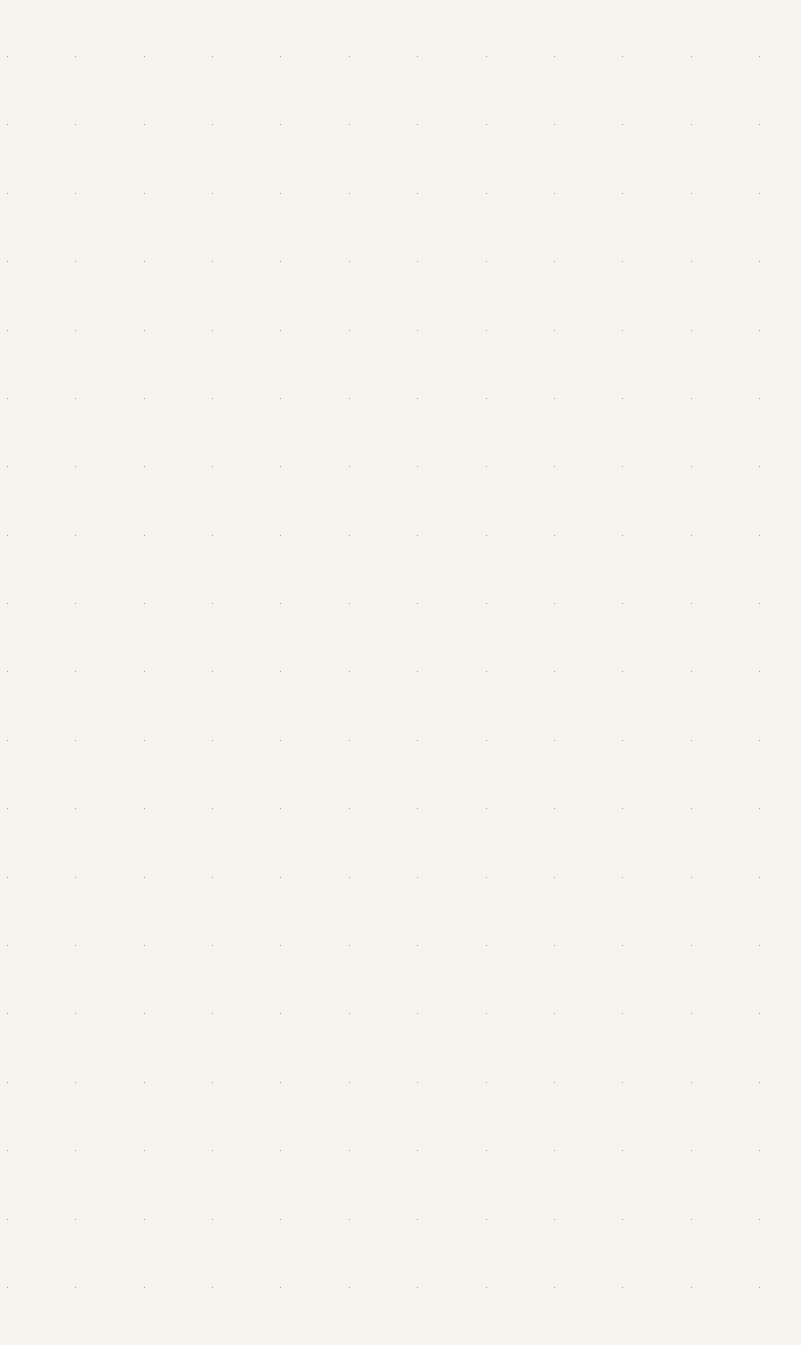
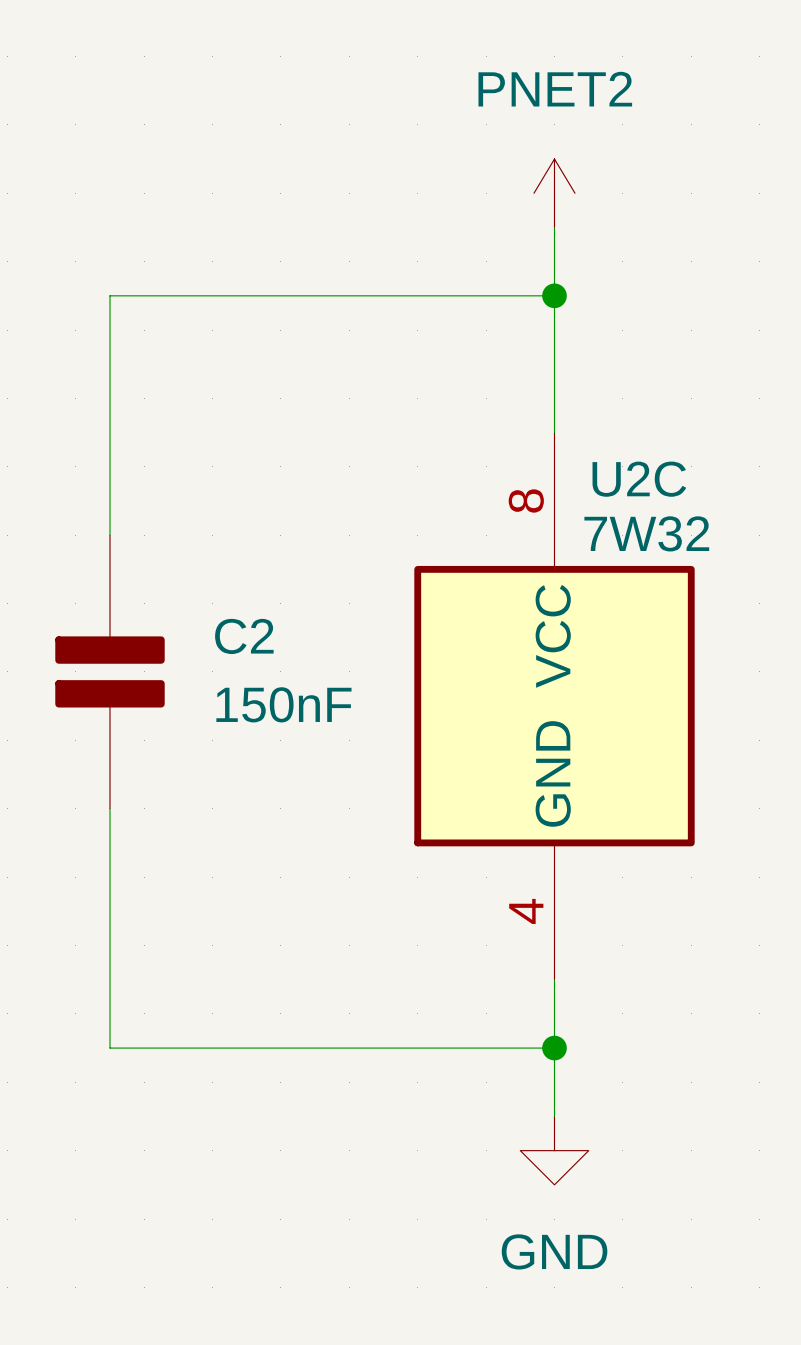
power symbol: none -> PNET2 (554, 193)
wire: none -> (554, 227) (554, 432)
wire: none -> (554, 295) (109, 295) (109, 535)
junction: none -> (554, 295)
C2: none -> 150nF (109, 671)
U2C: none -> 7W32 (554, 706)
wire: none -> (109, 808) (109, 1048) (554, 1048)
wire: none -> (554, 979) (554, 1116)
junction: none -> (554, 1048)
power symbol: none -> GND (554, 1150)

